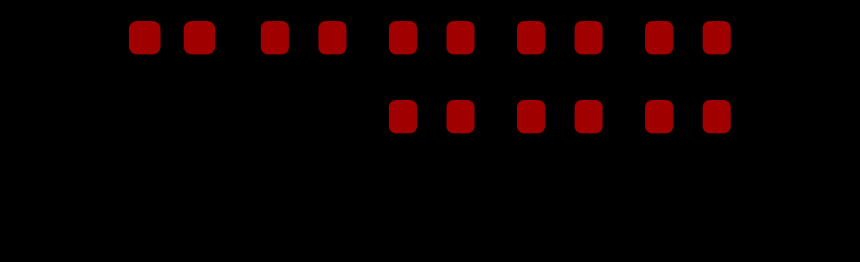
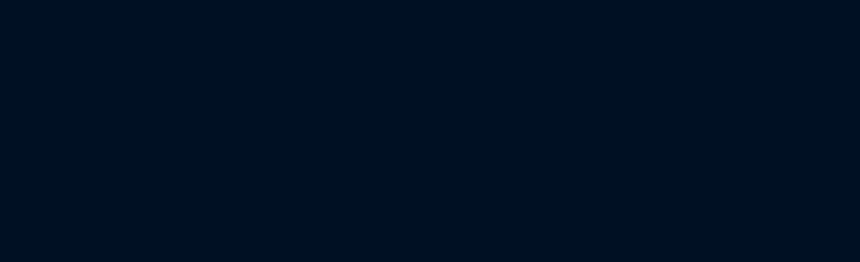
part: (172, 37) -> none
part: (303, 37) -> none
part: (431, 37) -> none
part: (559, 37) -> none
part: (687, 37) -> none
part: (431, 116) -> none
part: (559, 116) -> none
part: (687, 116) -> none

